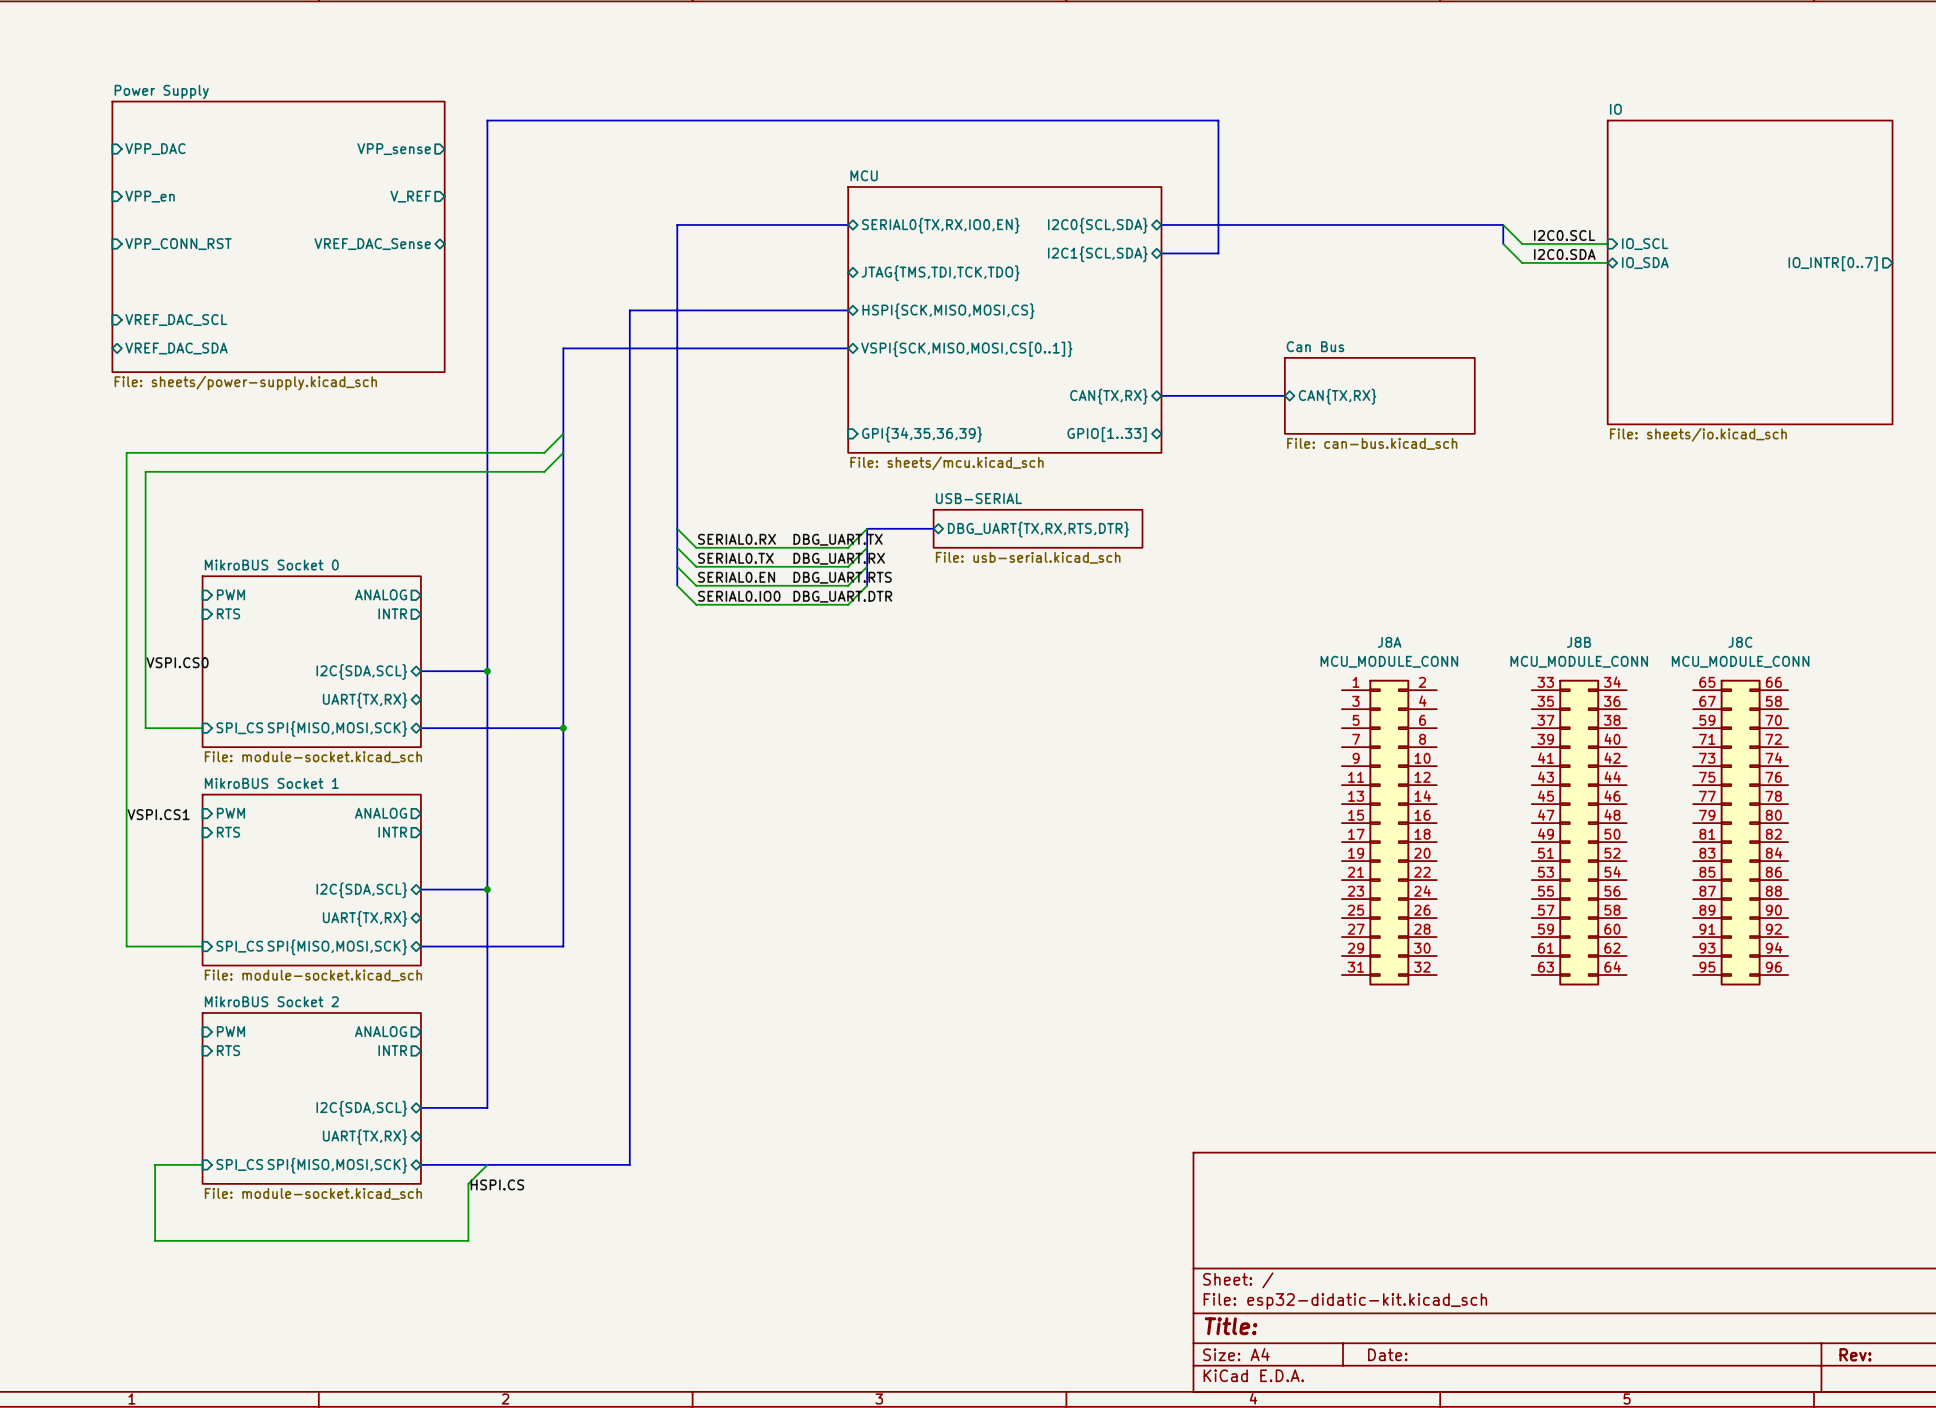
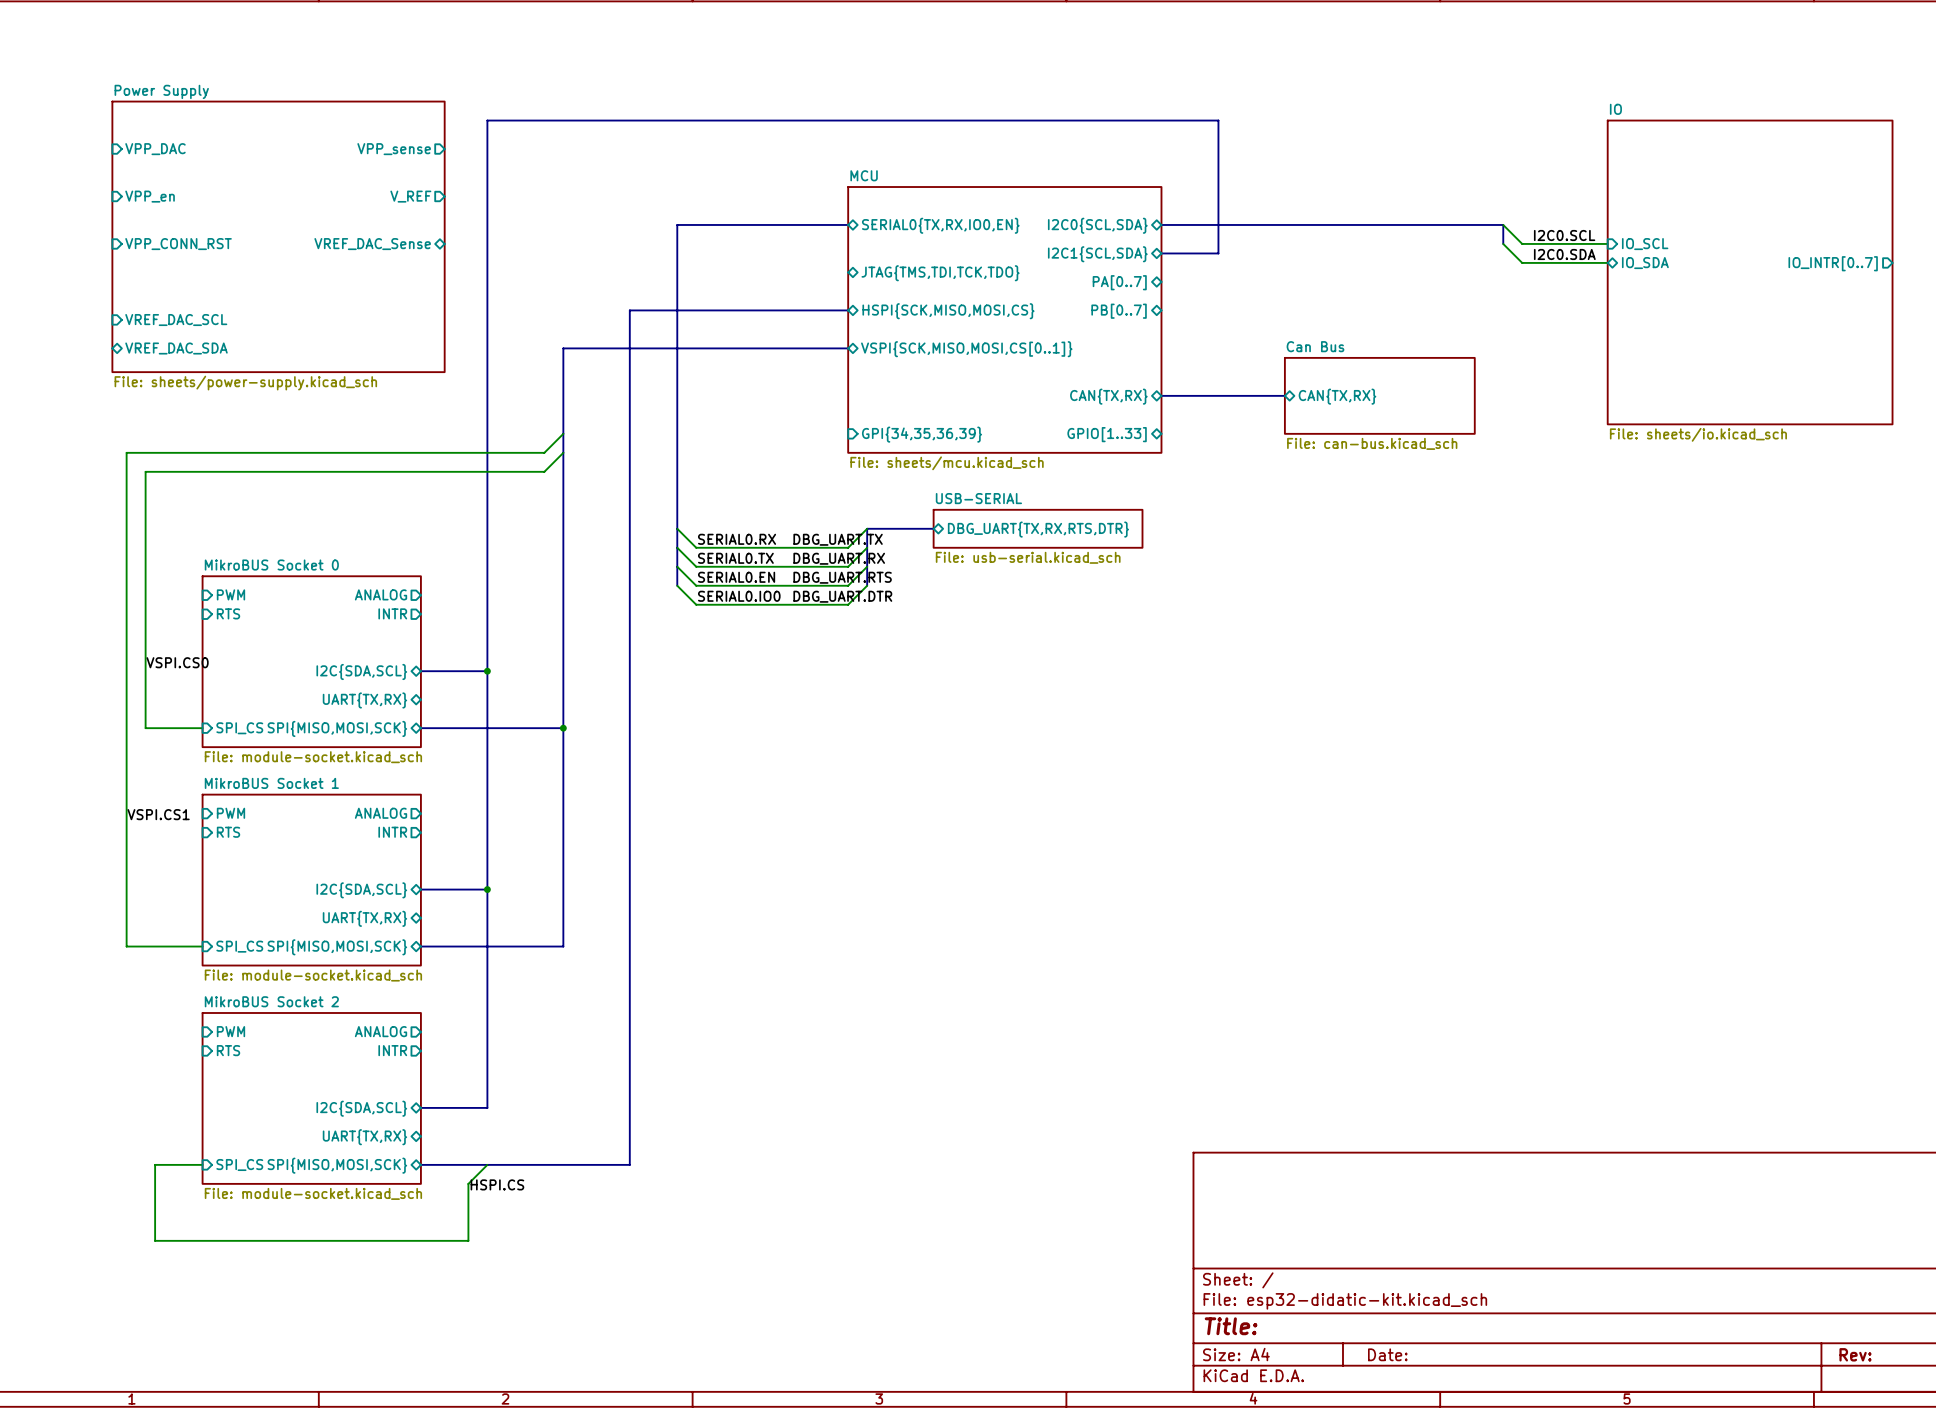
sheet pin: none -> PA[0..7] (1119, 282)
sheet pin: none -> PB[0..7] (1119, 311)
J8A: MCU_MODULE_CONN (1389, 832) -> none
J8B: MCU_MODULE_CONN (1579, 832) -> none
J8C: MCU_MODULE_CONN (1740, 832) -> none

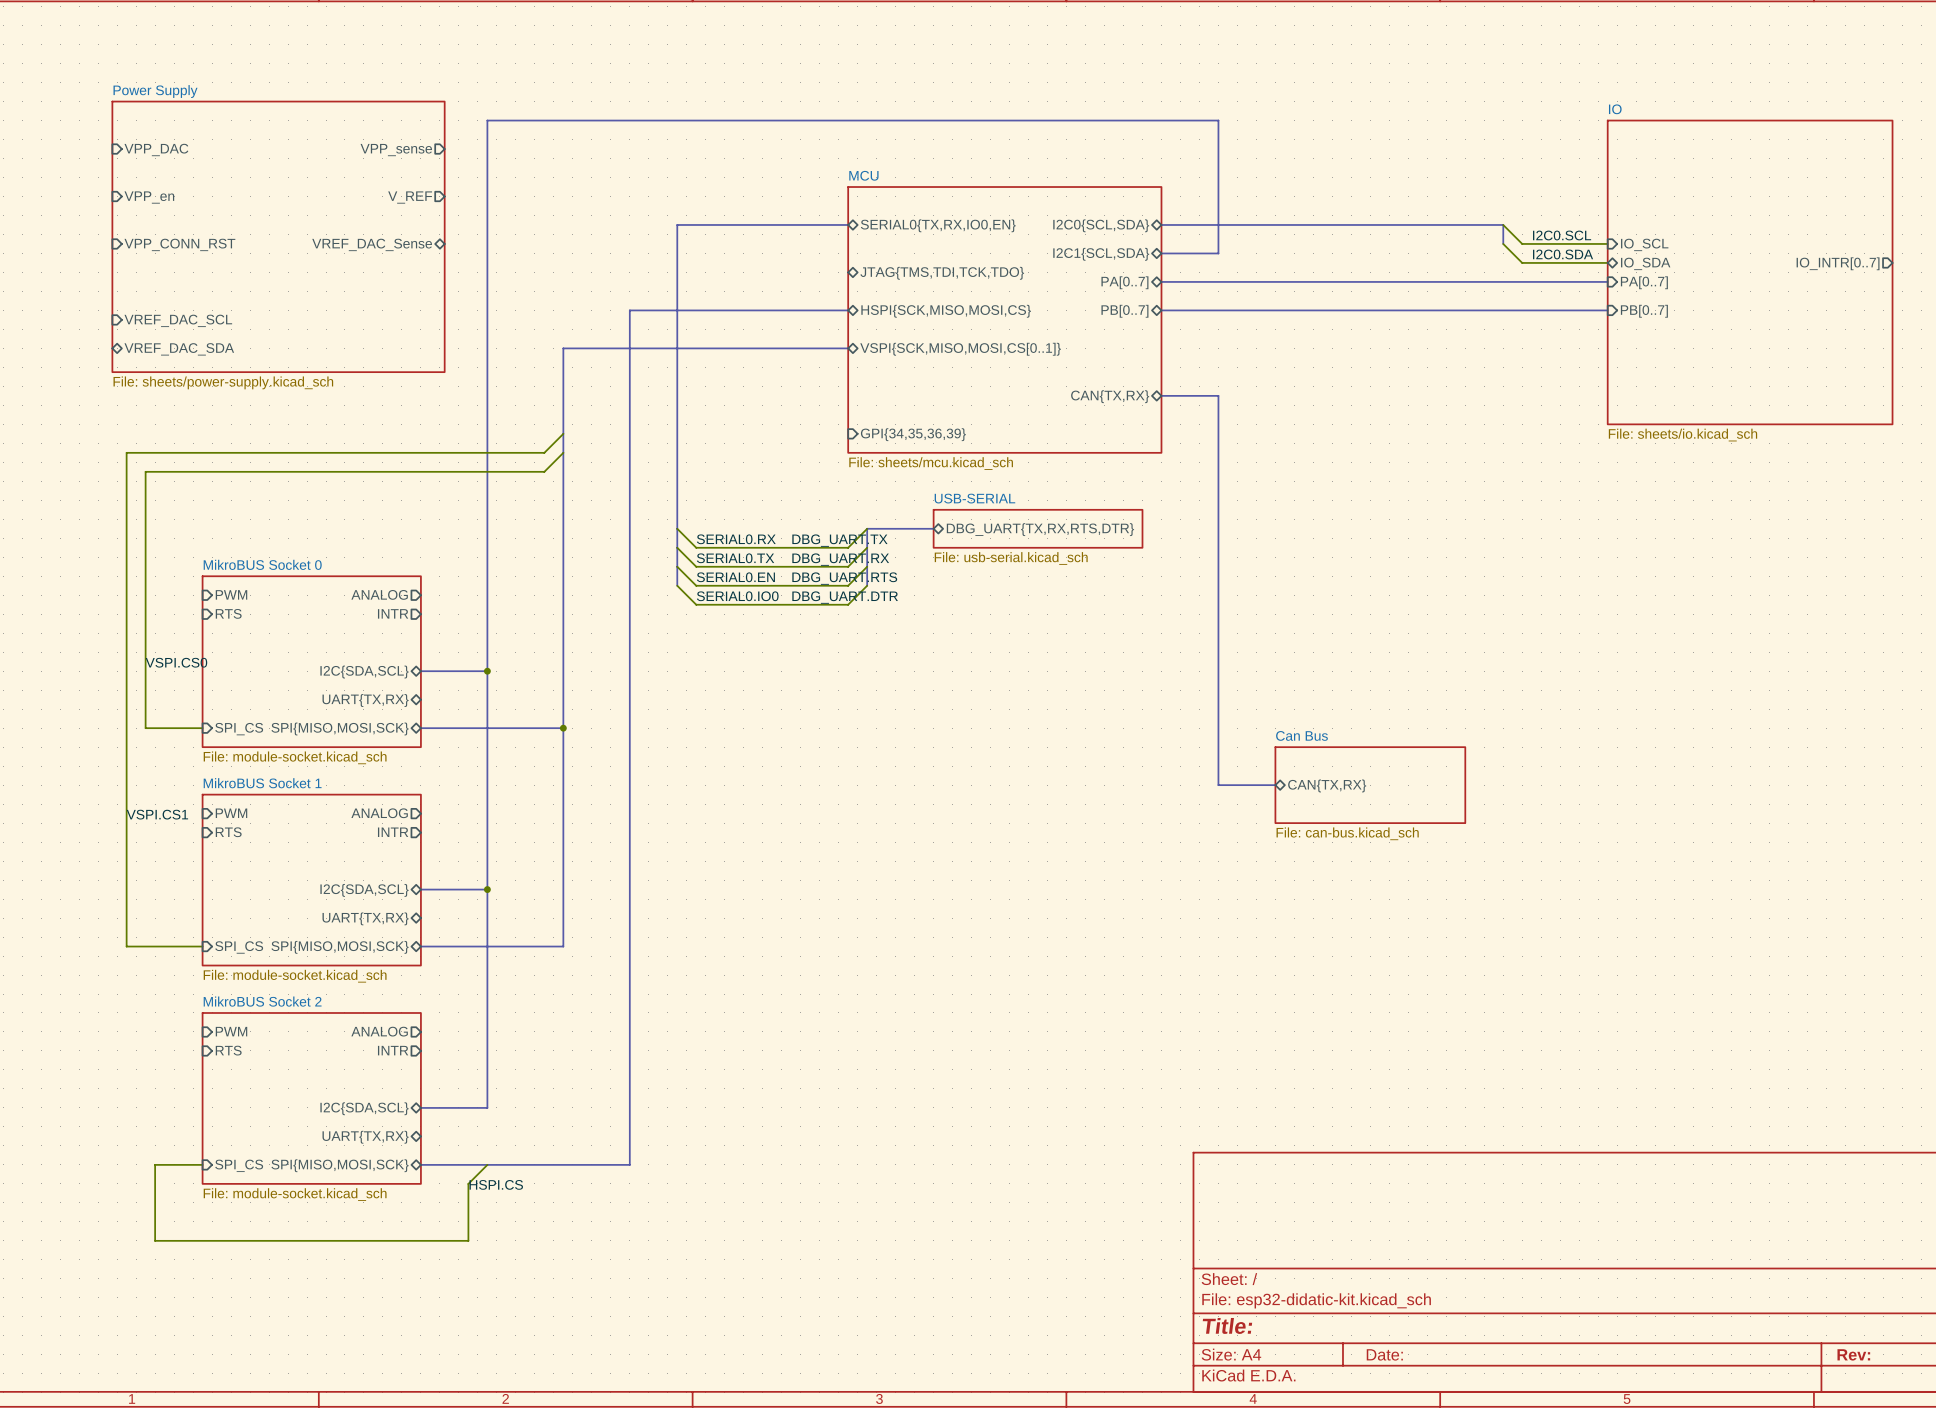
bus: none -> (1161, 281) (1607, 281)
sheet pin: none -> PA[0..7] (1644, 282)
bus: none -> (1161, 310) (1607, 310)
sheet pin: none -> PB[0..7] (1644, 311)
bus: (1218, 395) (1284, 395) -> (1218, 395) (1218, 785) (1275, 785)
sheet Can Bus: File: can-bus.kicad_sch (1379, 395) -> none
sheet pin: CAN{TX,RX} (1337, 396) -> none
sheet pin: GPIO[1..33] (1107, 434) -> none
sheet pin: none -> CAN{TX,RX} (1327, 785)
sheet Can Bus: none -> File: can-bus.kicad_sch (1370, 785)

